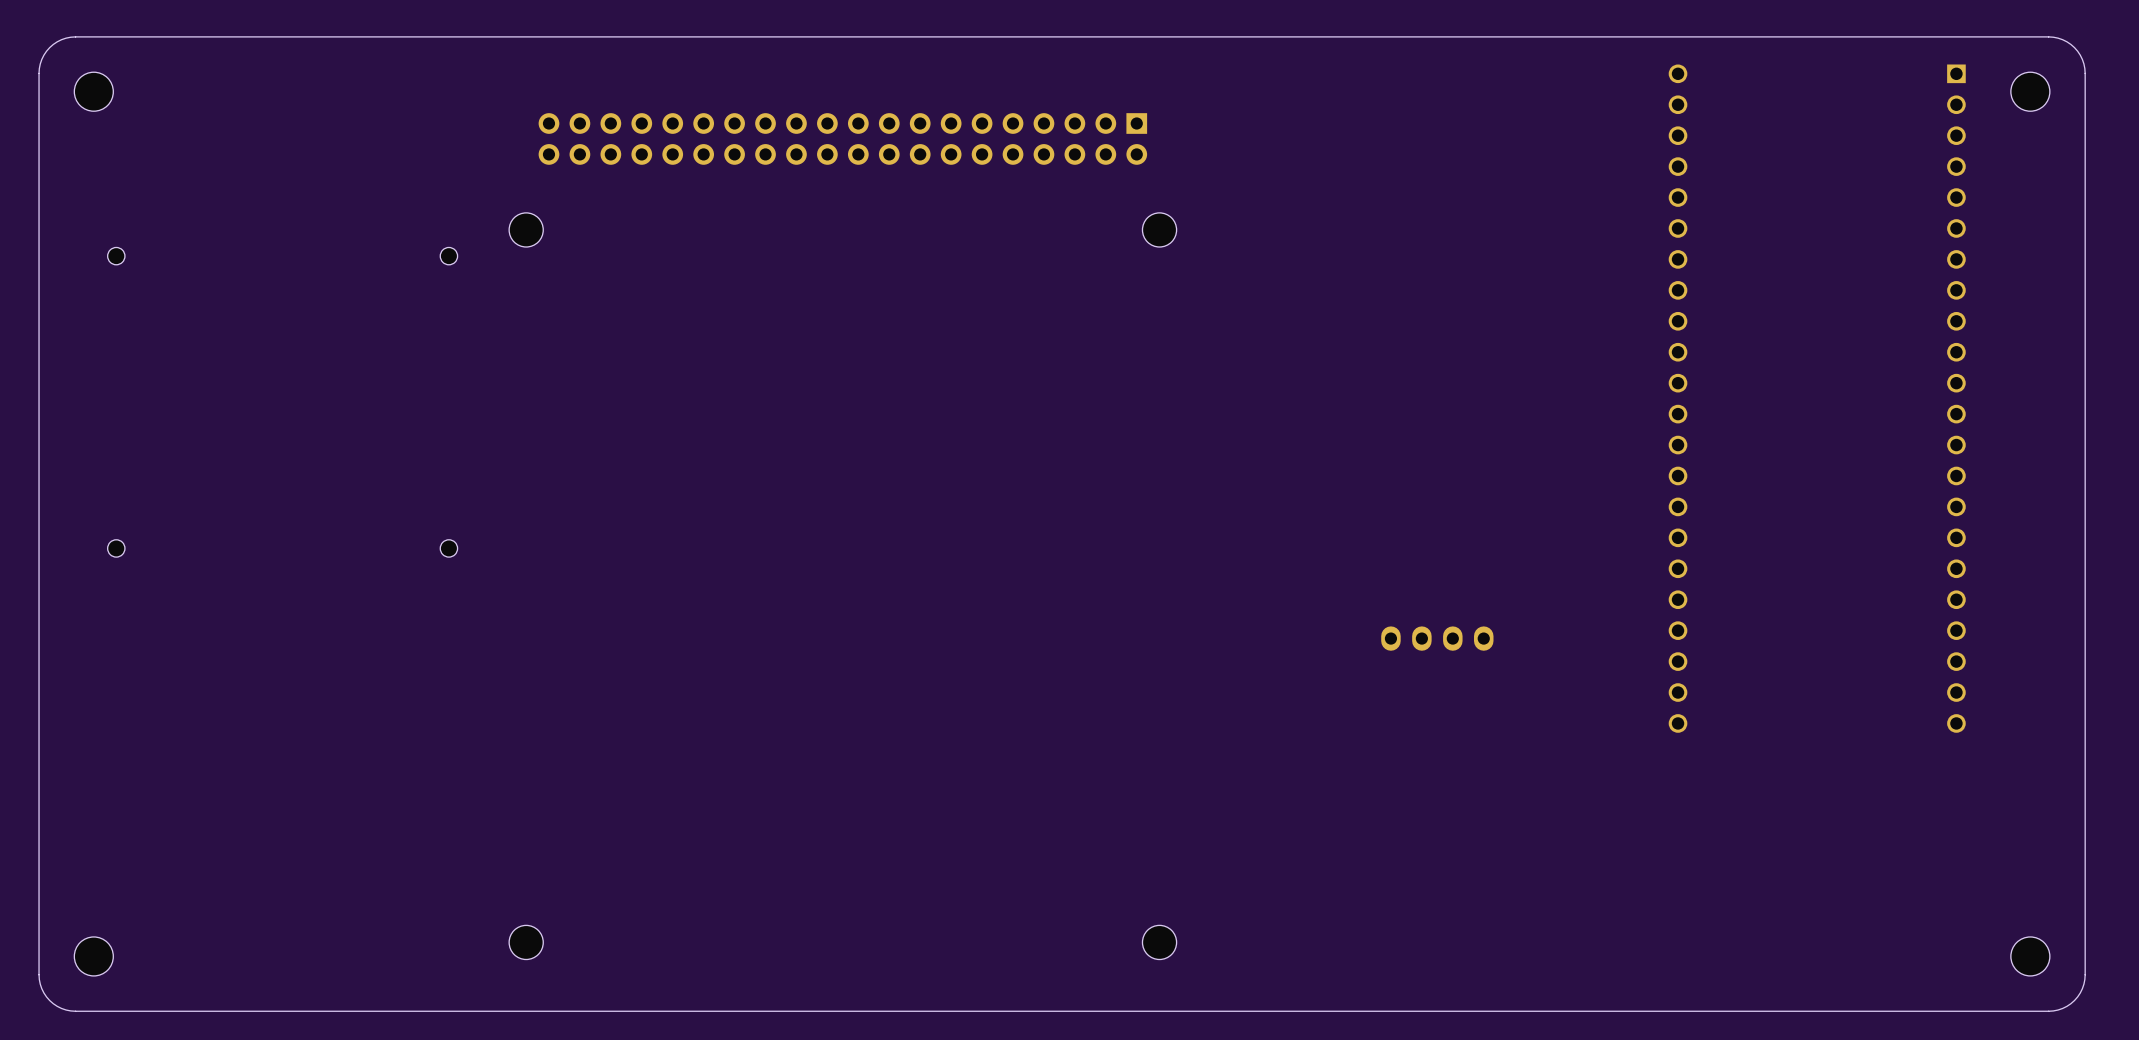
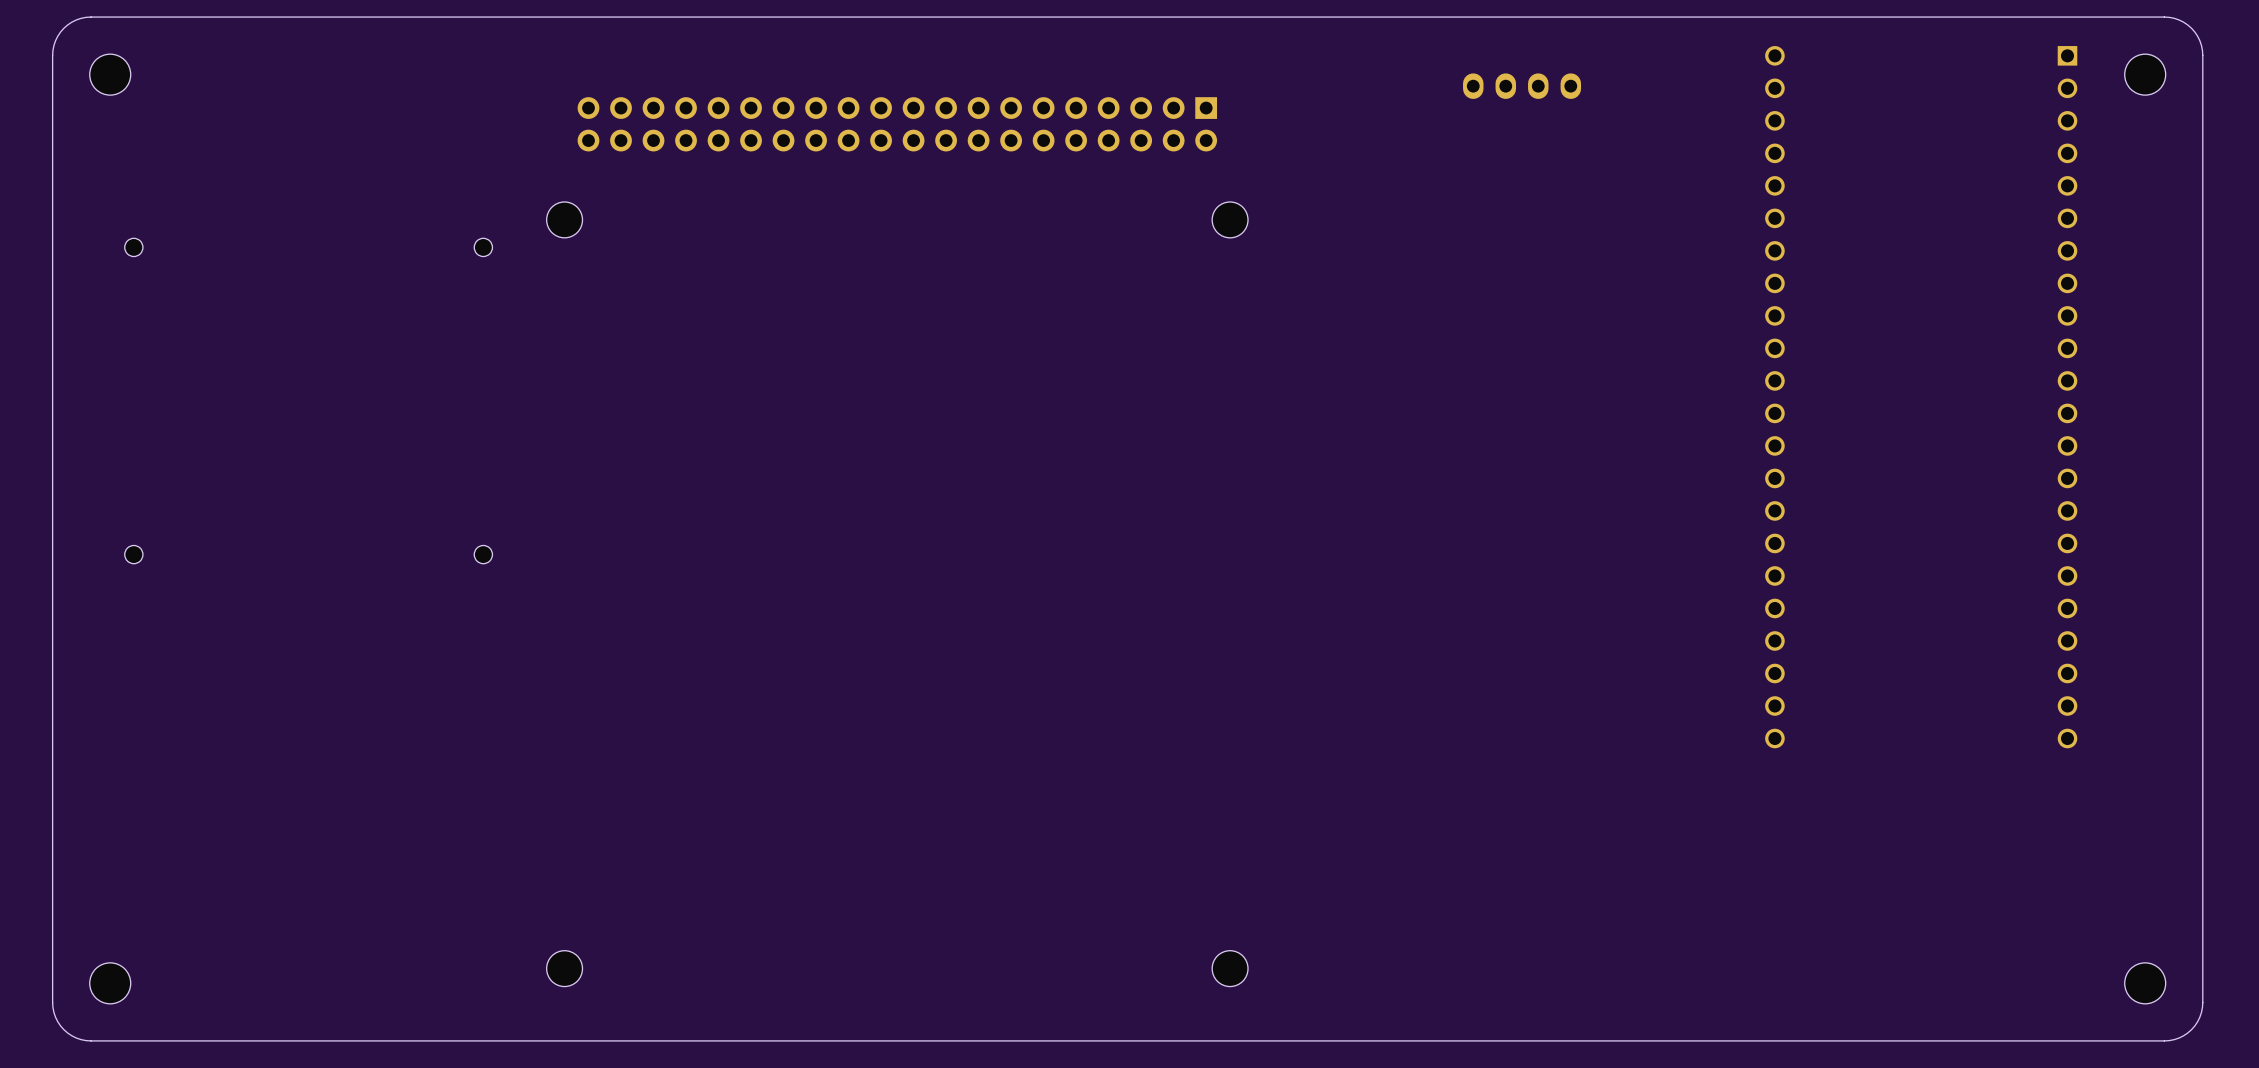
part: none -> (1522, 86)
part: (1437, 638) -> none

